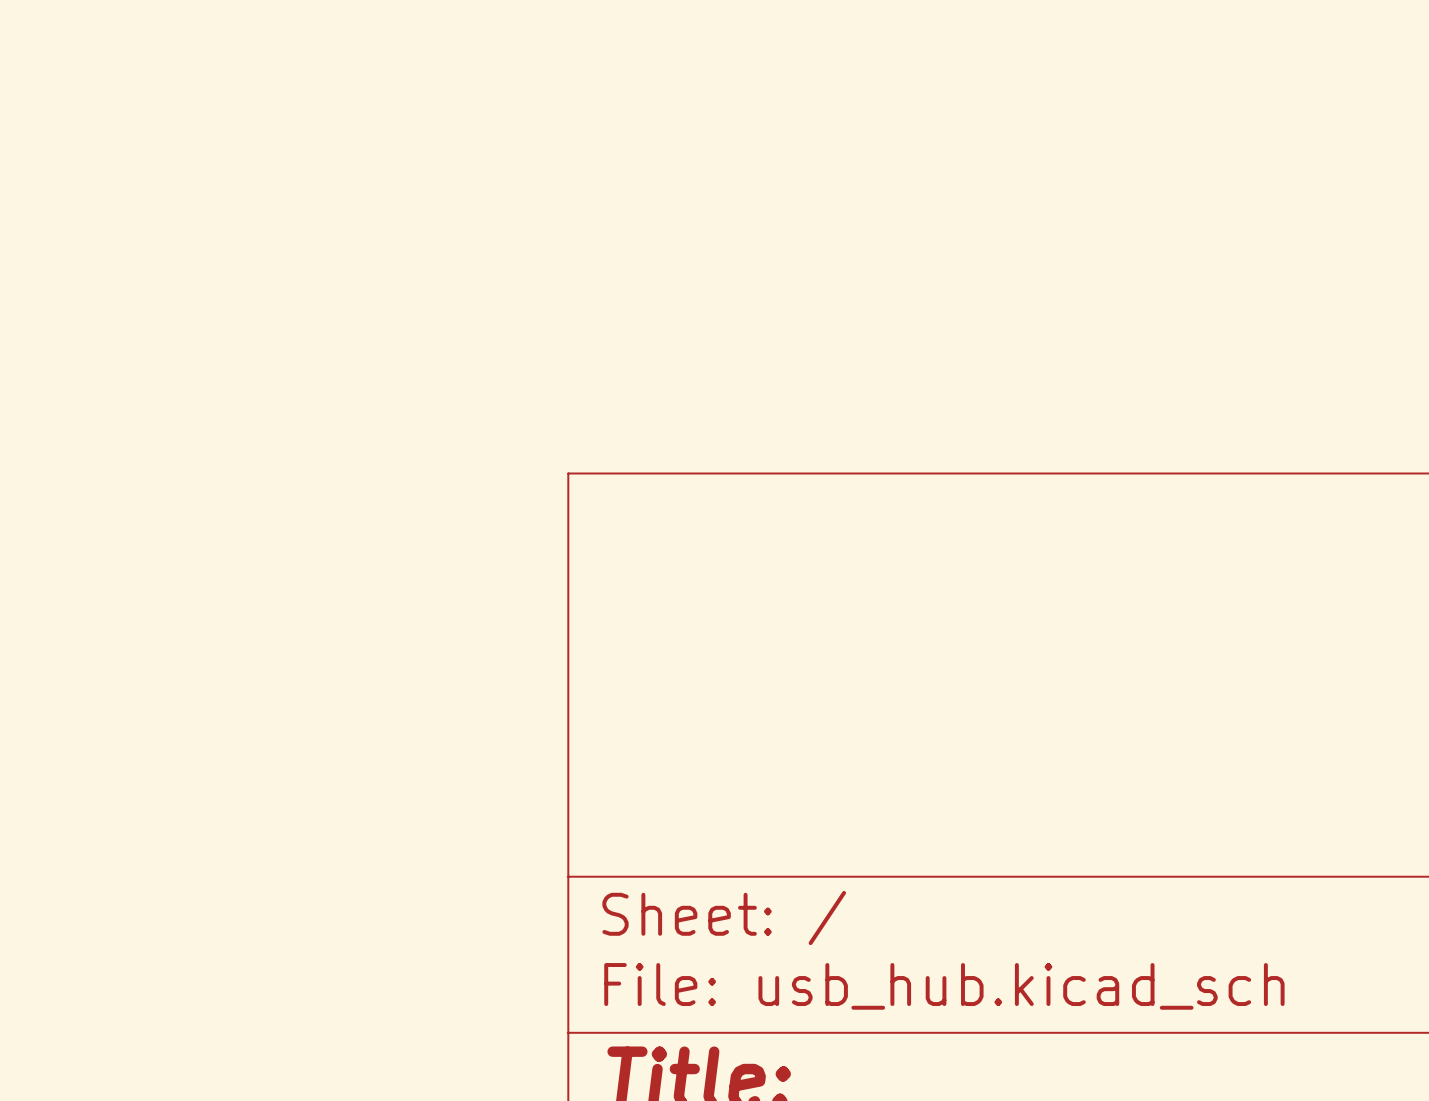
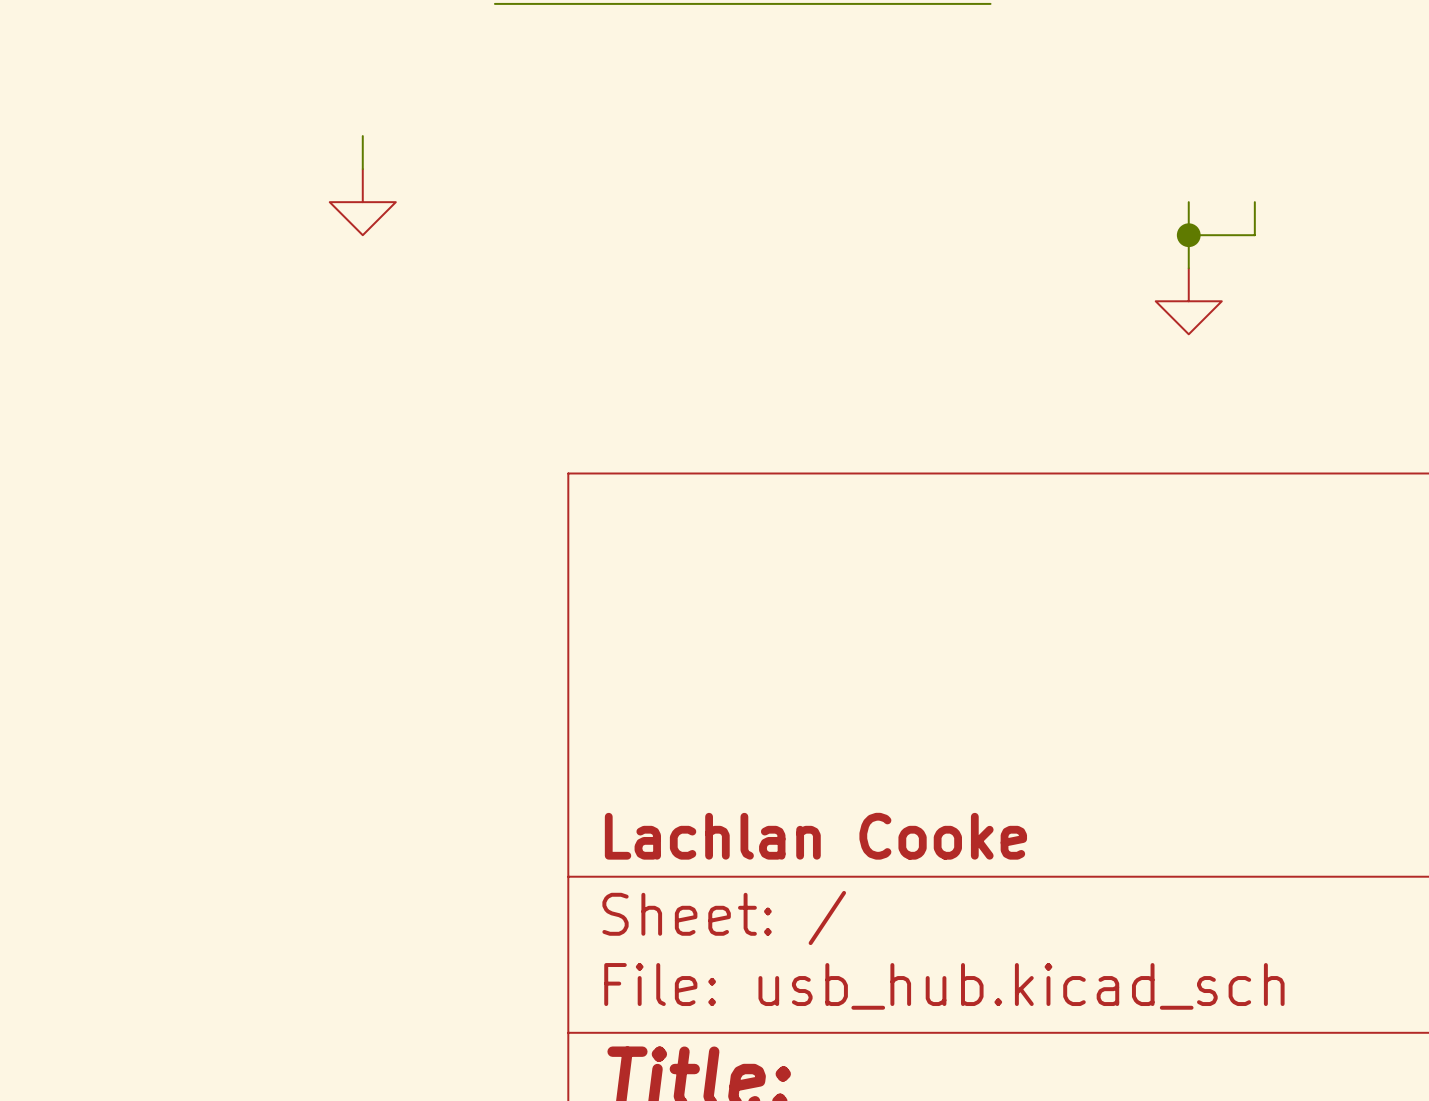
wire: none -> (494, 3) (990, 3)
wire: none -> (362, 136) (362, 169)
power symbol: none -> (362, 202)
wire: none -> (1188, 202) (1188, 268)
wire: none -> (1254, 202) (1254, 235) (1188, 235)
junction: none -> (1188, 235)
power symbol: none -> (1188, 301)
title block: none -> Lachlan Cooke (815, 836)

